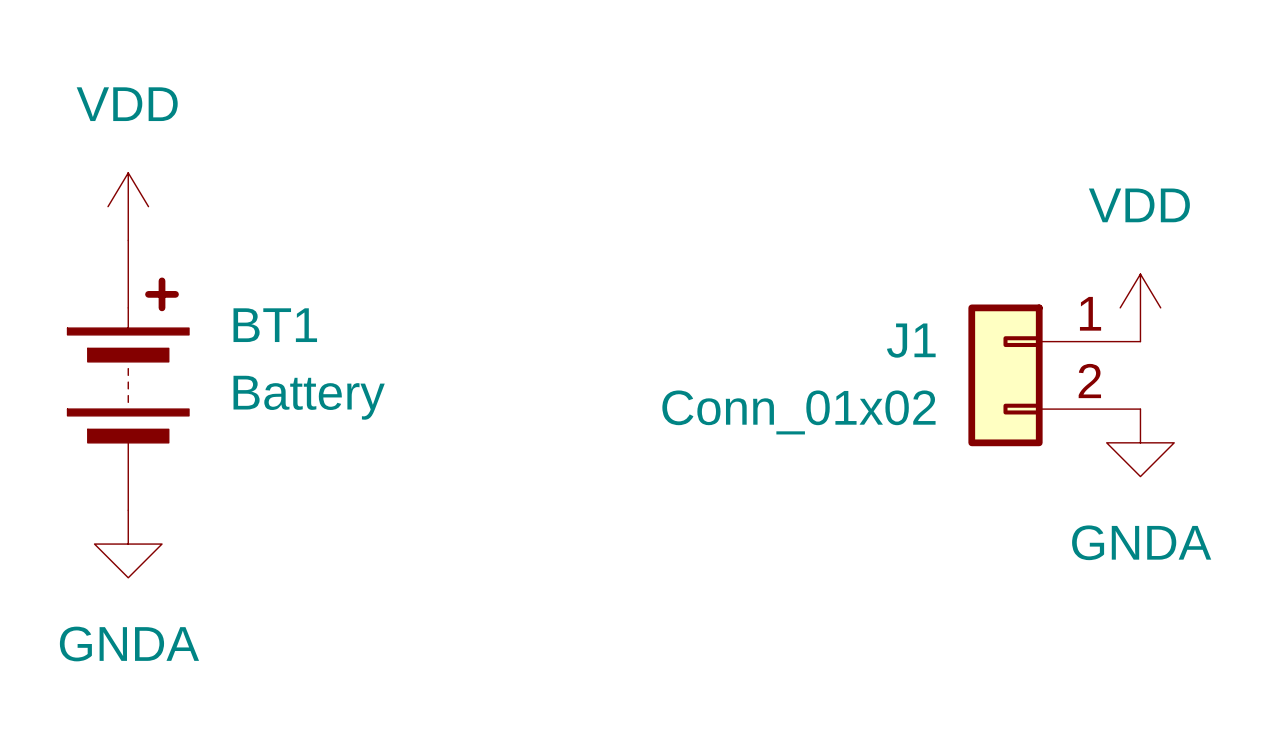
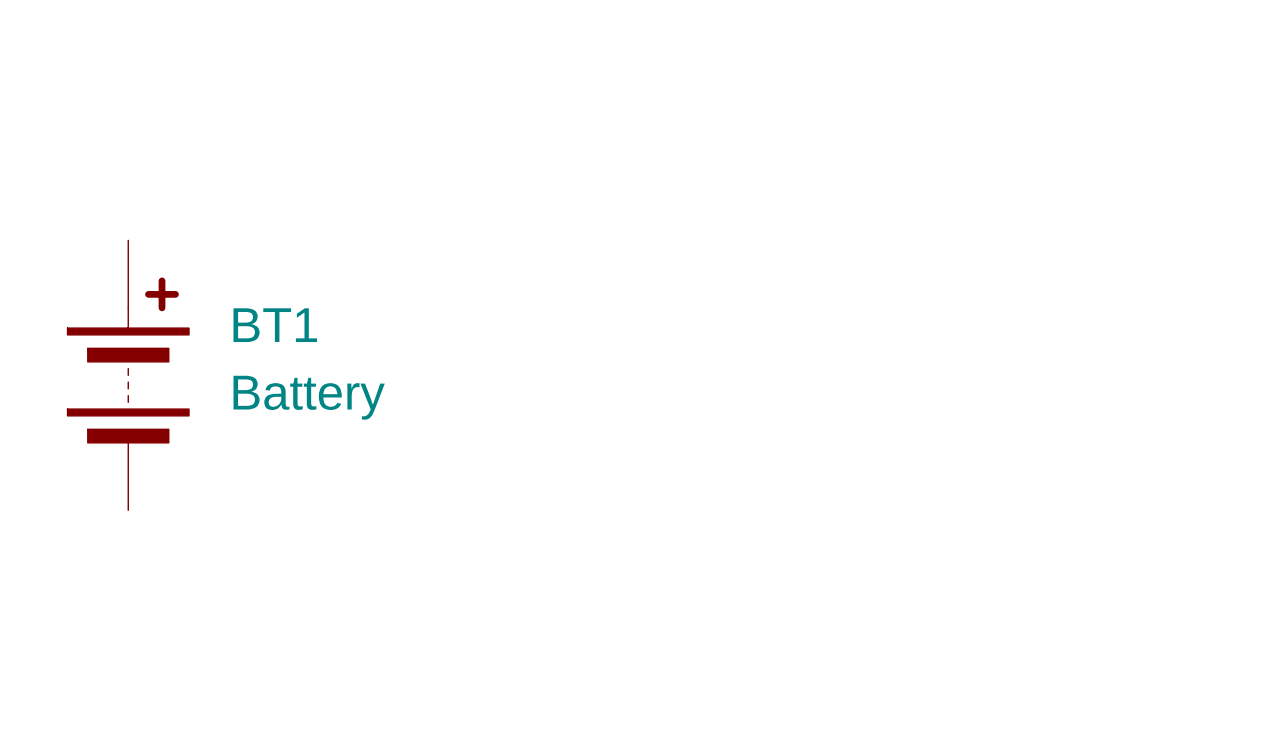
power symbol: VDD (128, 206) -> none
power symbol: VDD (1140, 307) -> none
J1: Conn_01x02 (1054, 375) -> none
power symbol: GNDA (1140, 442) -> none
power symbol: GNDA (128, 544) -> none

